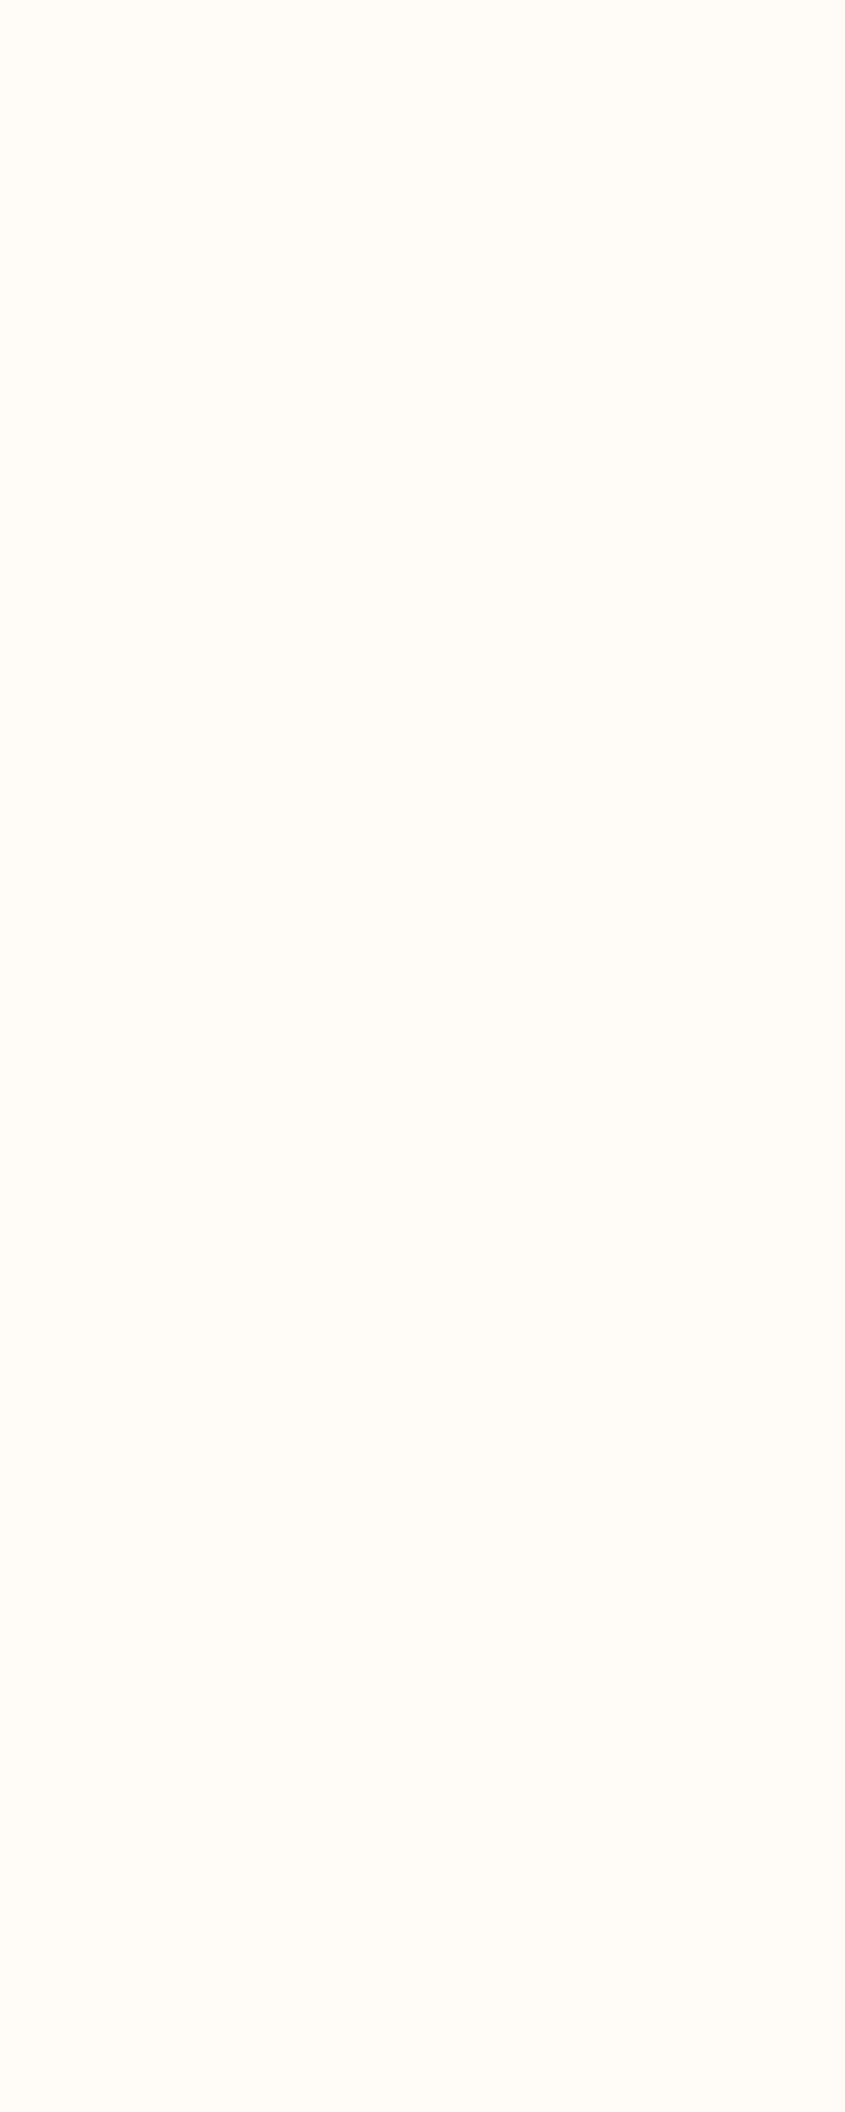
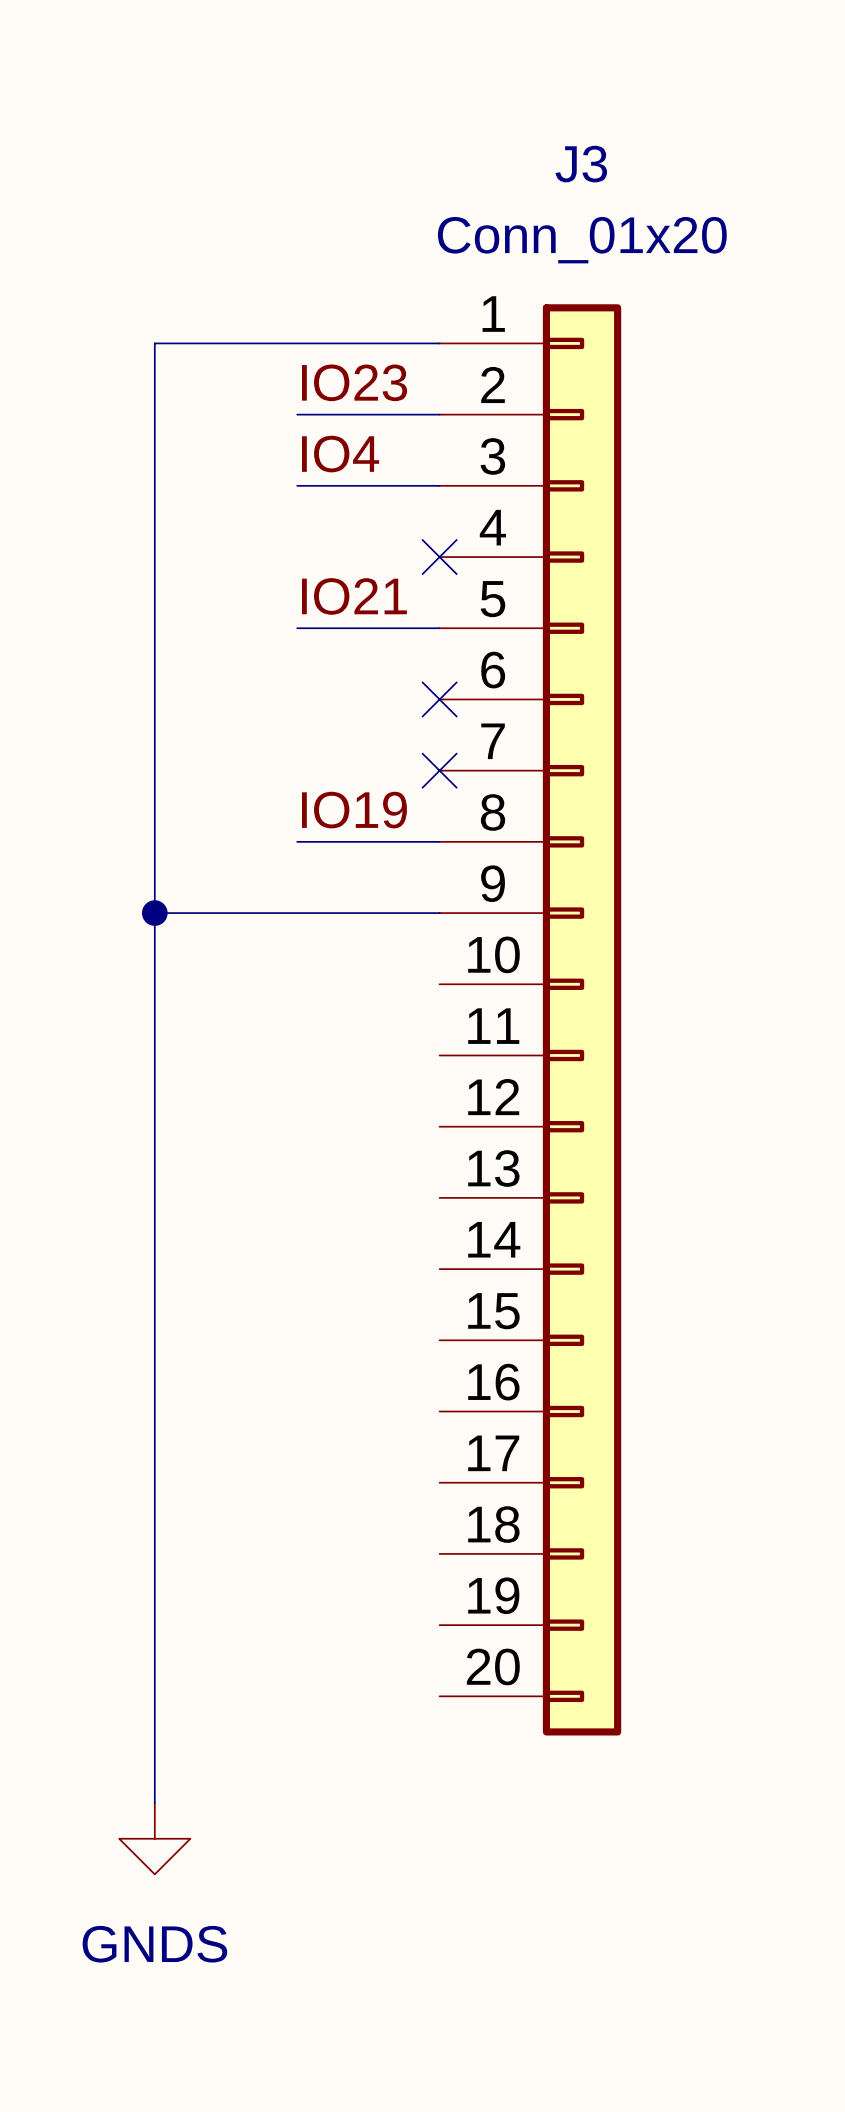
wire: none -> (439, 343) (154, 343) (154, 1803)
label: none -> IO23 (354, 382)
wire: none -> (297, 414) (439, 414)
label: none -> IO4 (340, 454)
wire: none -> (297, 485) (439, 485)
no-connect mark: none -> (439, 557)
label: none -> IO21 (354, 596)
wire: none -> (297, 628) (439, 628)
no-connect mark: none -> (439, 699)
no-connect mark: none -> (439, 770)
label: none -> IO19 (354, 810)
wire: none -> (297, 841) (439, 841)
wire: none -> (154, 913) (439, 913)
junction: none -> (154, 913)
J3: none -> Conn_01x20 (530, 1019)
power symbol: none -> GNDS (154, 1838)

